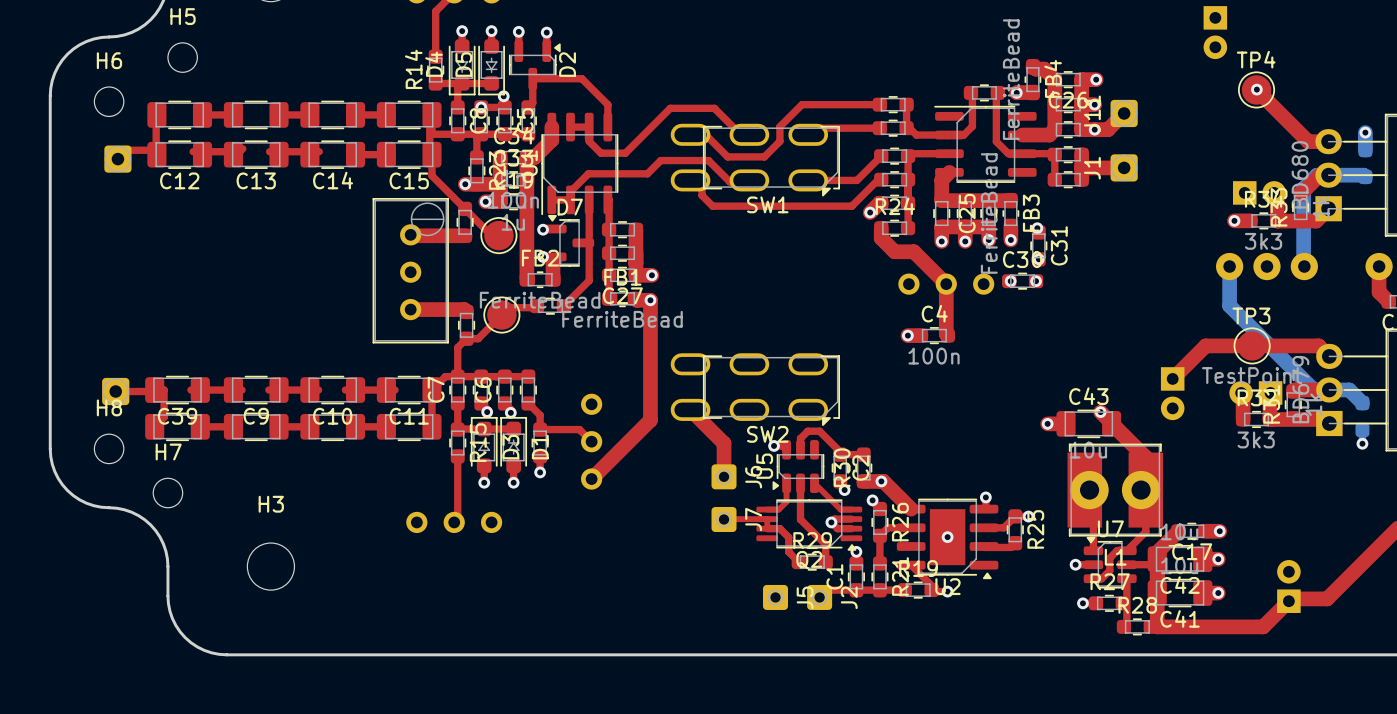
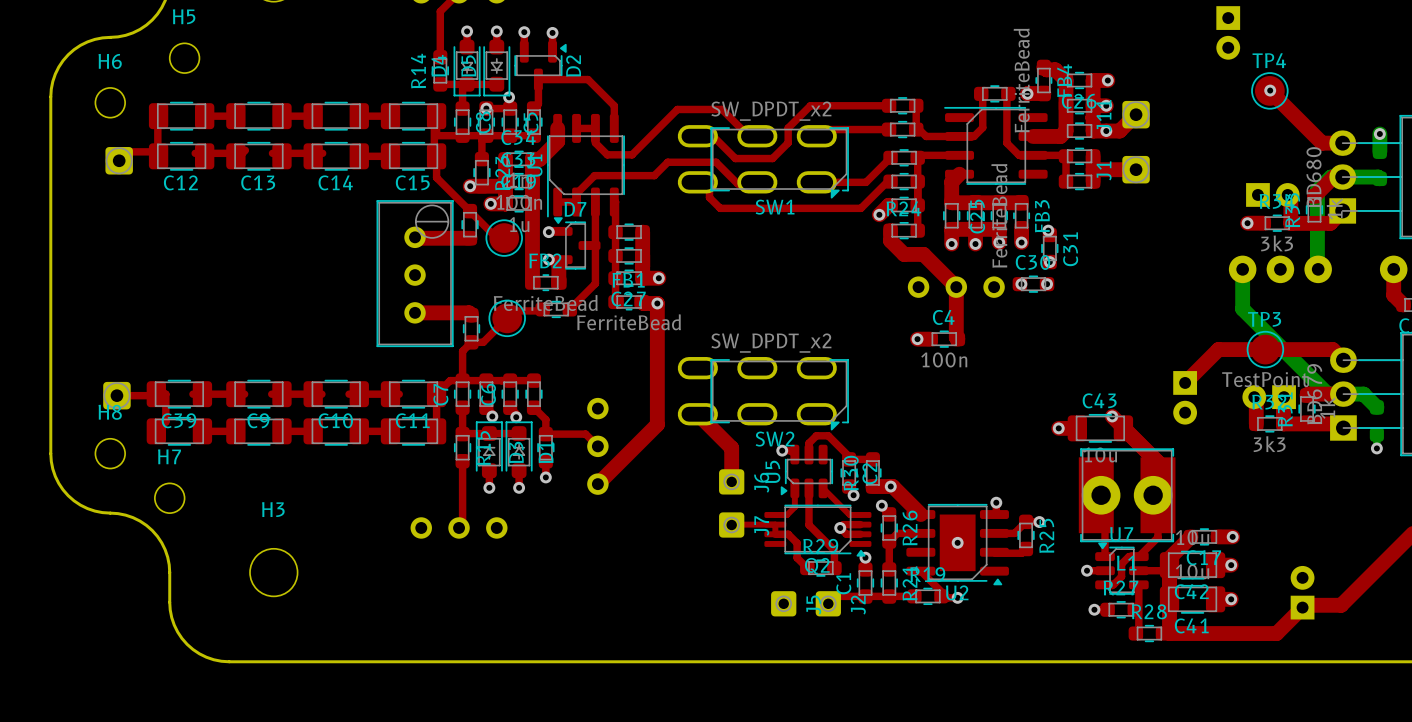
SW1 value: none -> SW_DPDT_x2 (771, 111)
SW2 value: none -> SW_DPDT_x2 (771, 343)

